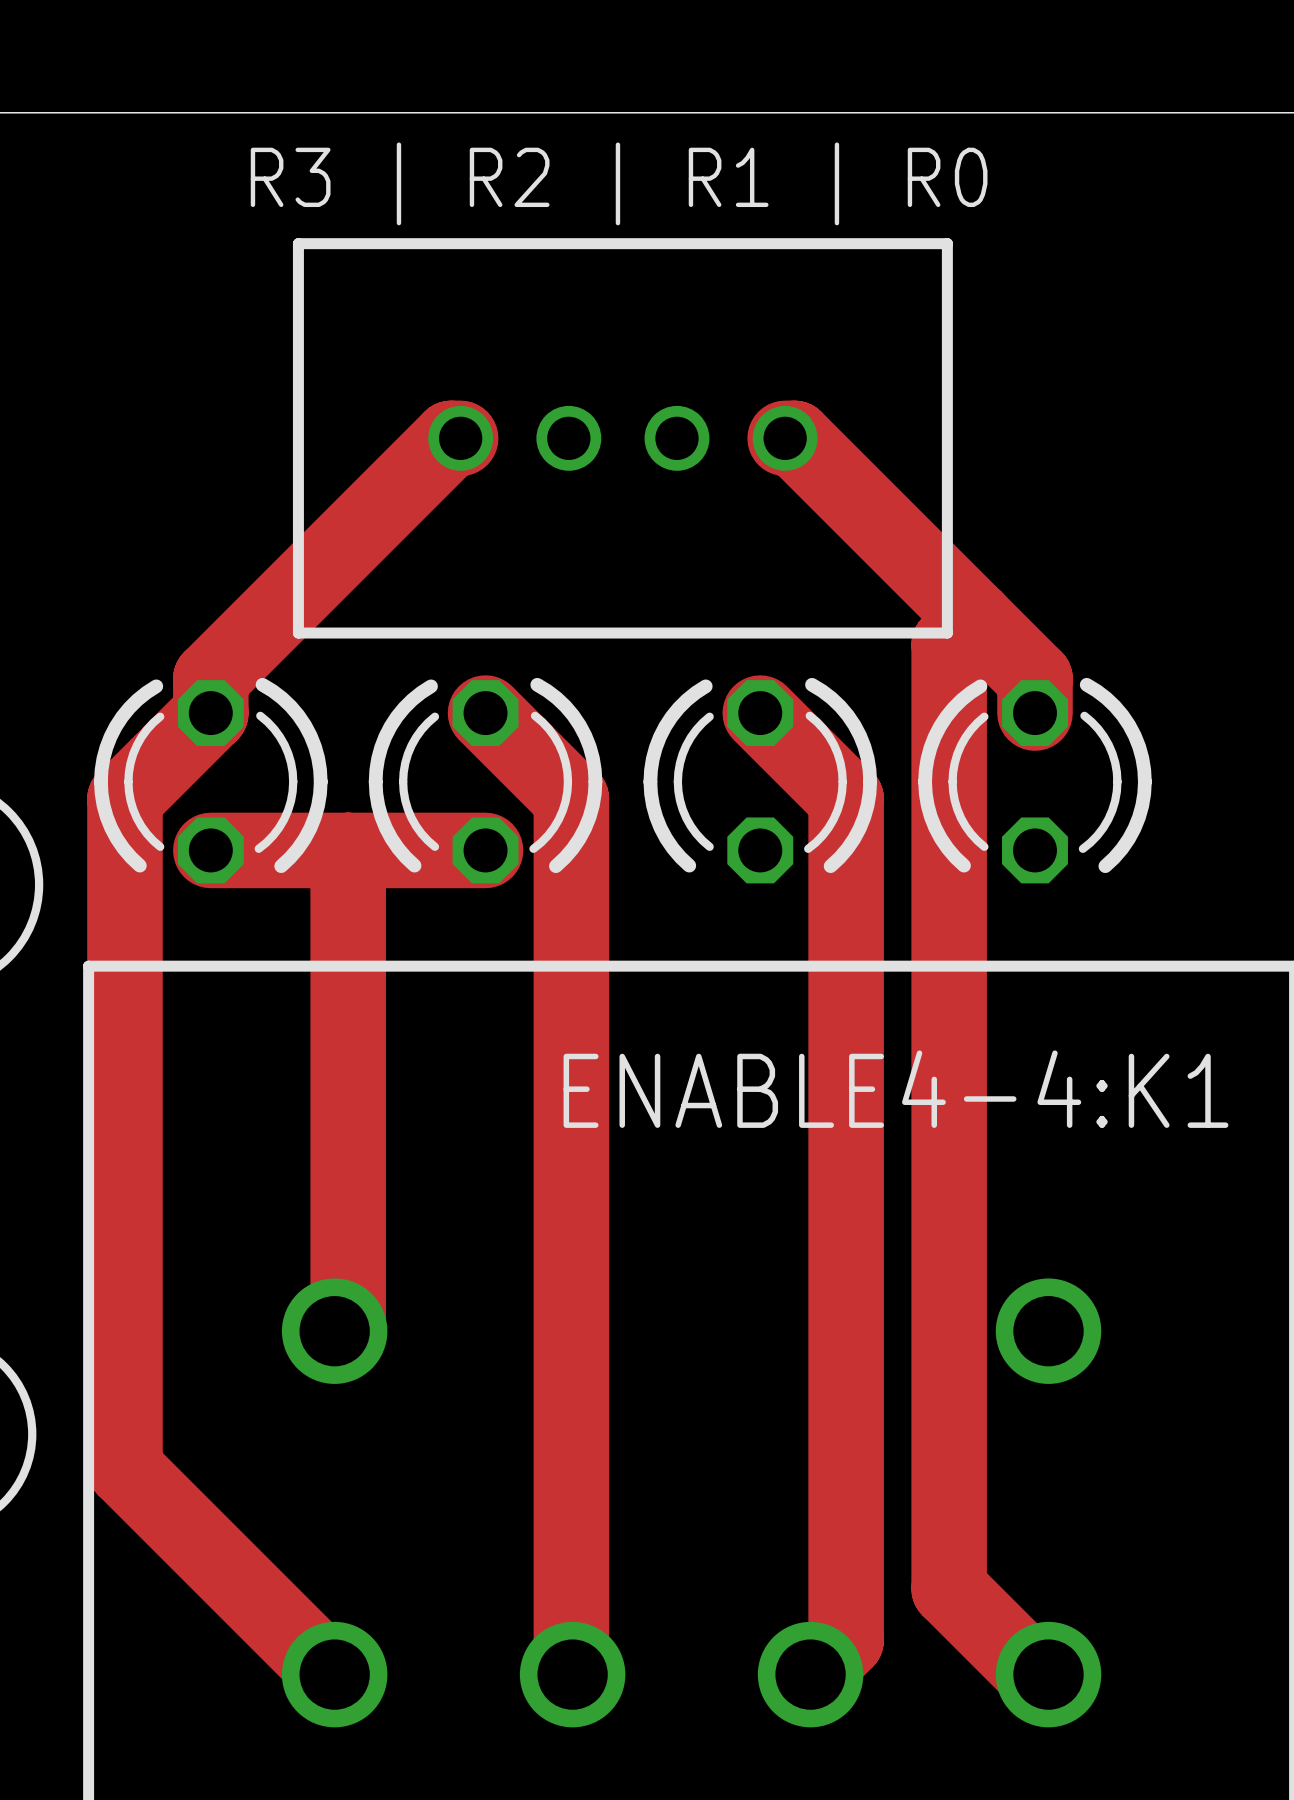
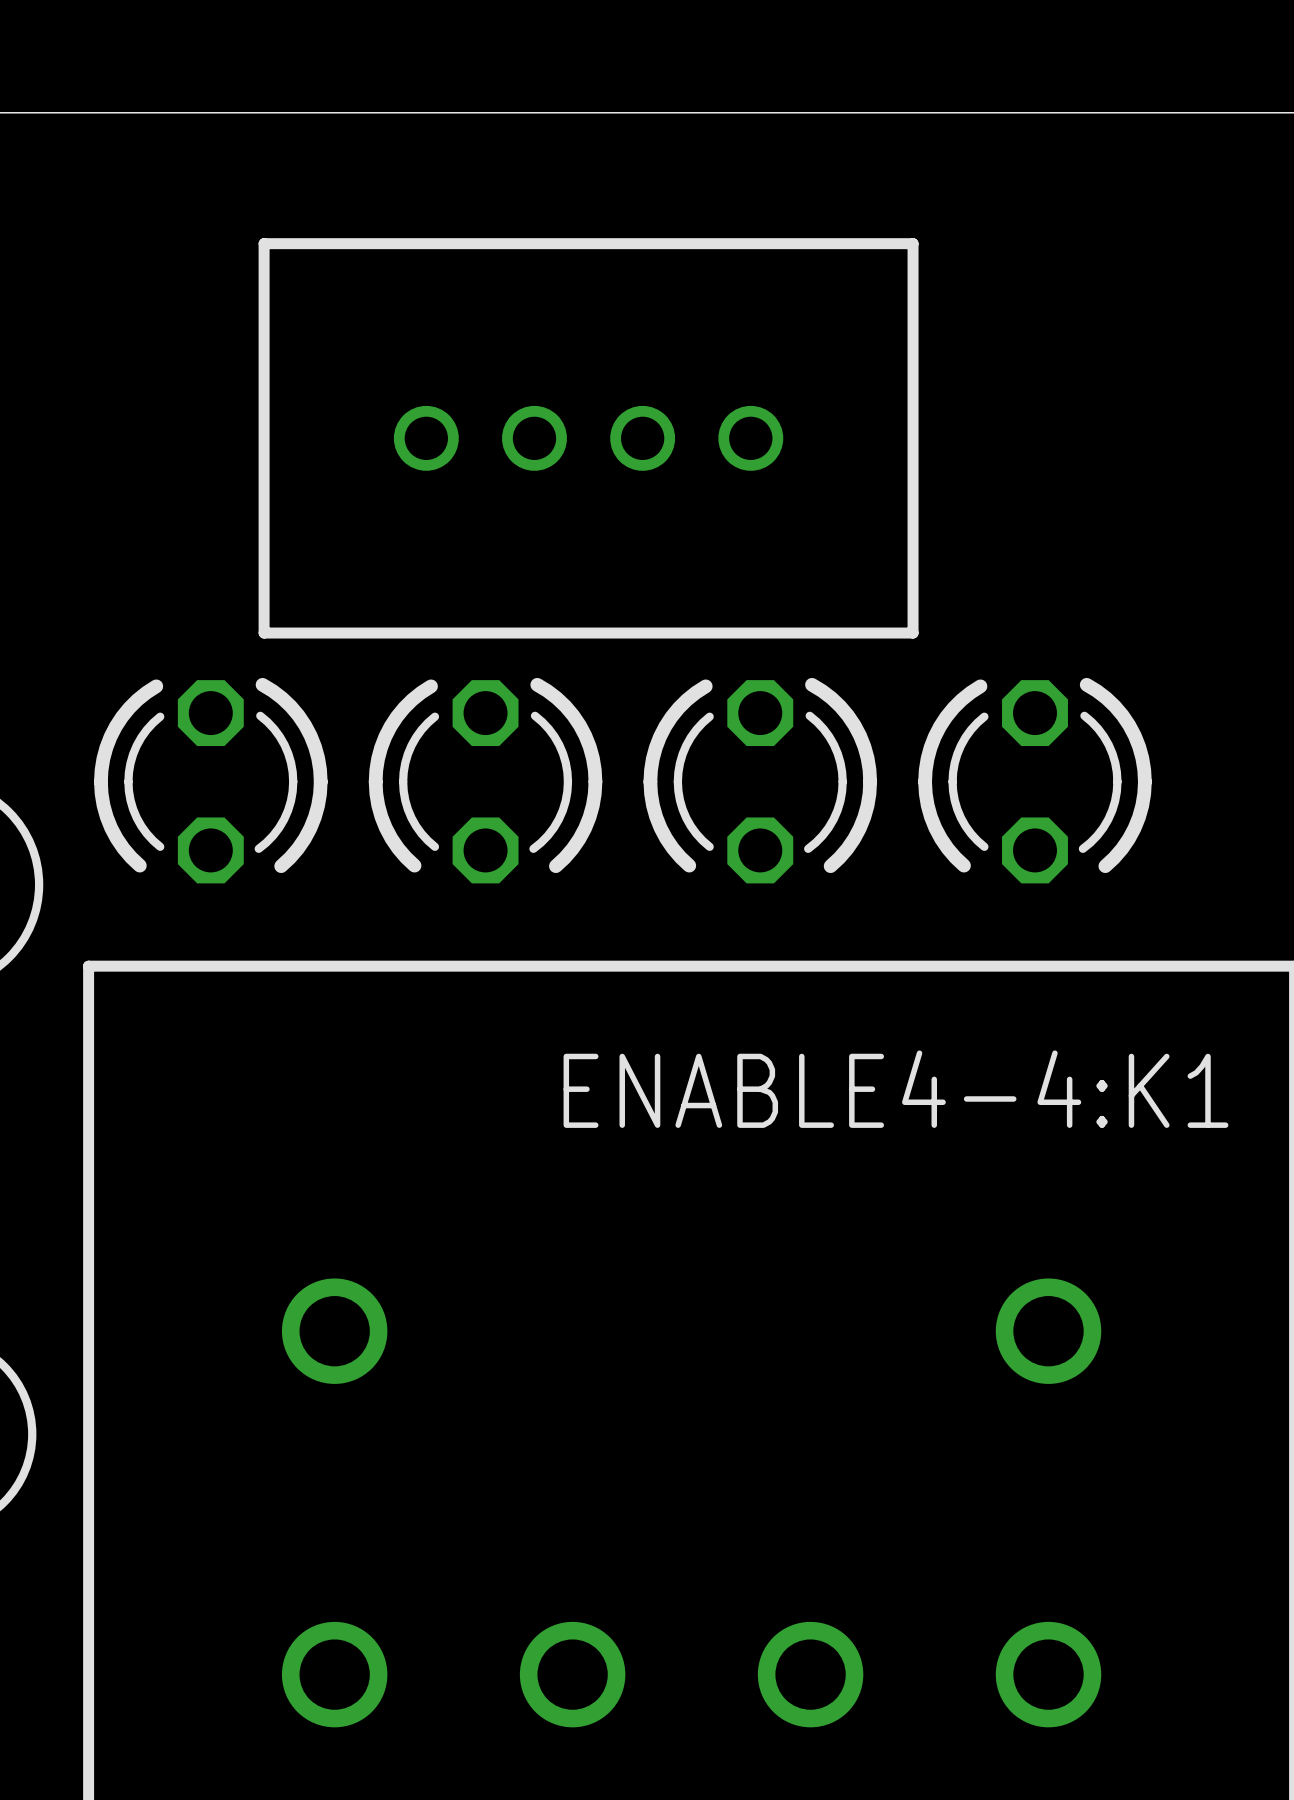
text: R3 | R2 | R1 | R0 (619, 183) -> none
track: (460, 438) (451, 438) (210, 678) (210, 713) (124, 798) (124, 1468) (331, 1674) (334, 1674) -> none
part position: (622, 438) -> (588, 438)
track: (785, 438) (794, 438) (1034, 678) (1034, 713) -> none
track: (974, 618) (949, 644) (949, 1588) (1034, 1674) (1048, 1674) -> none
track: (485, 713) (571, 798) (572, 1674) -> none
track: (760, 713) (846, 798) (846, 1640) (810, 1674) -> none
track: (210, 850) (485, 850) -> none
track: (348, 850) (348, 1331) (334, 1331) -> none

